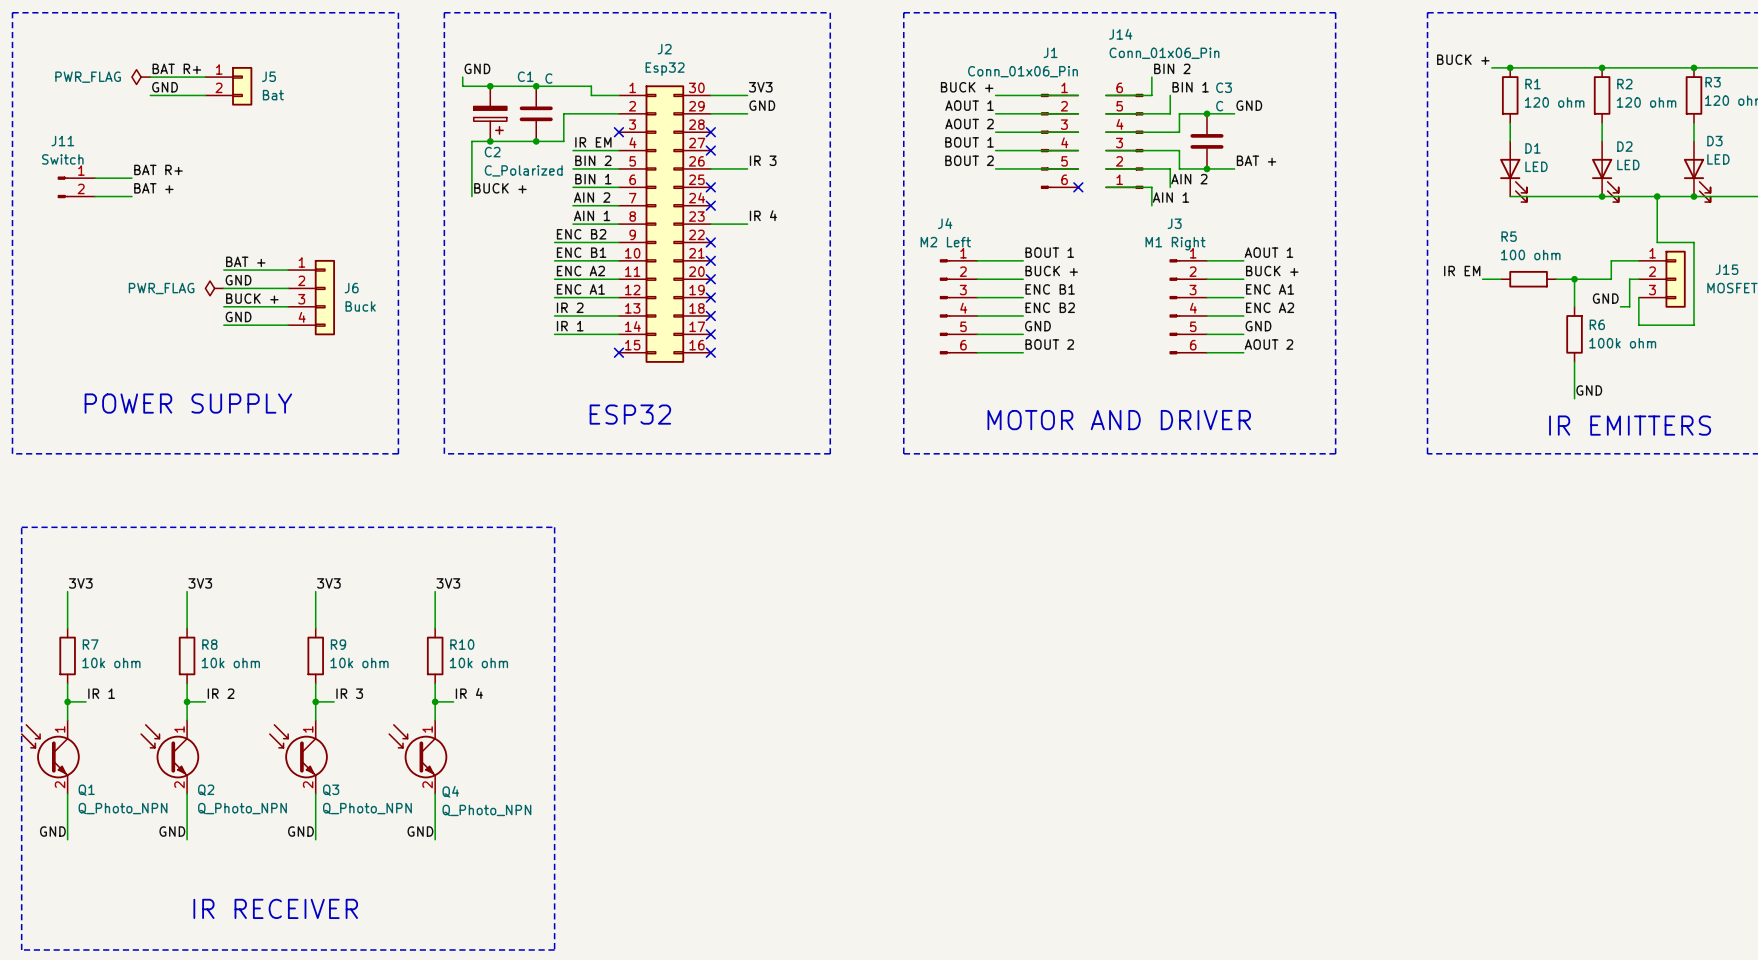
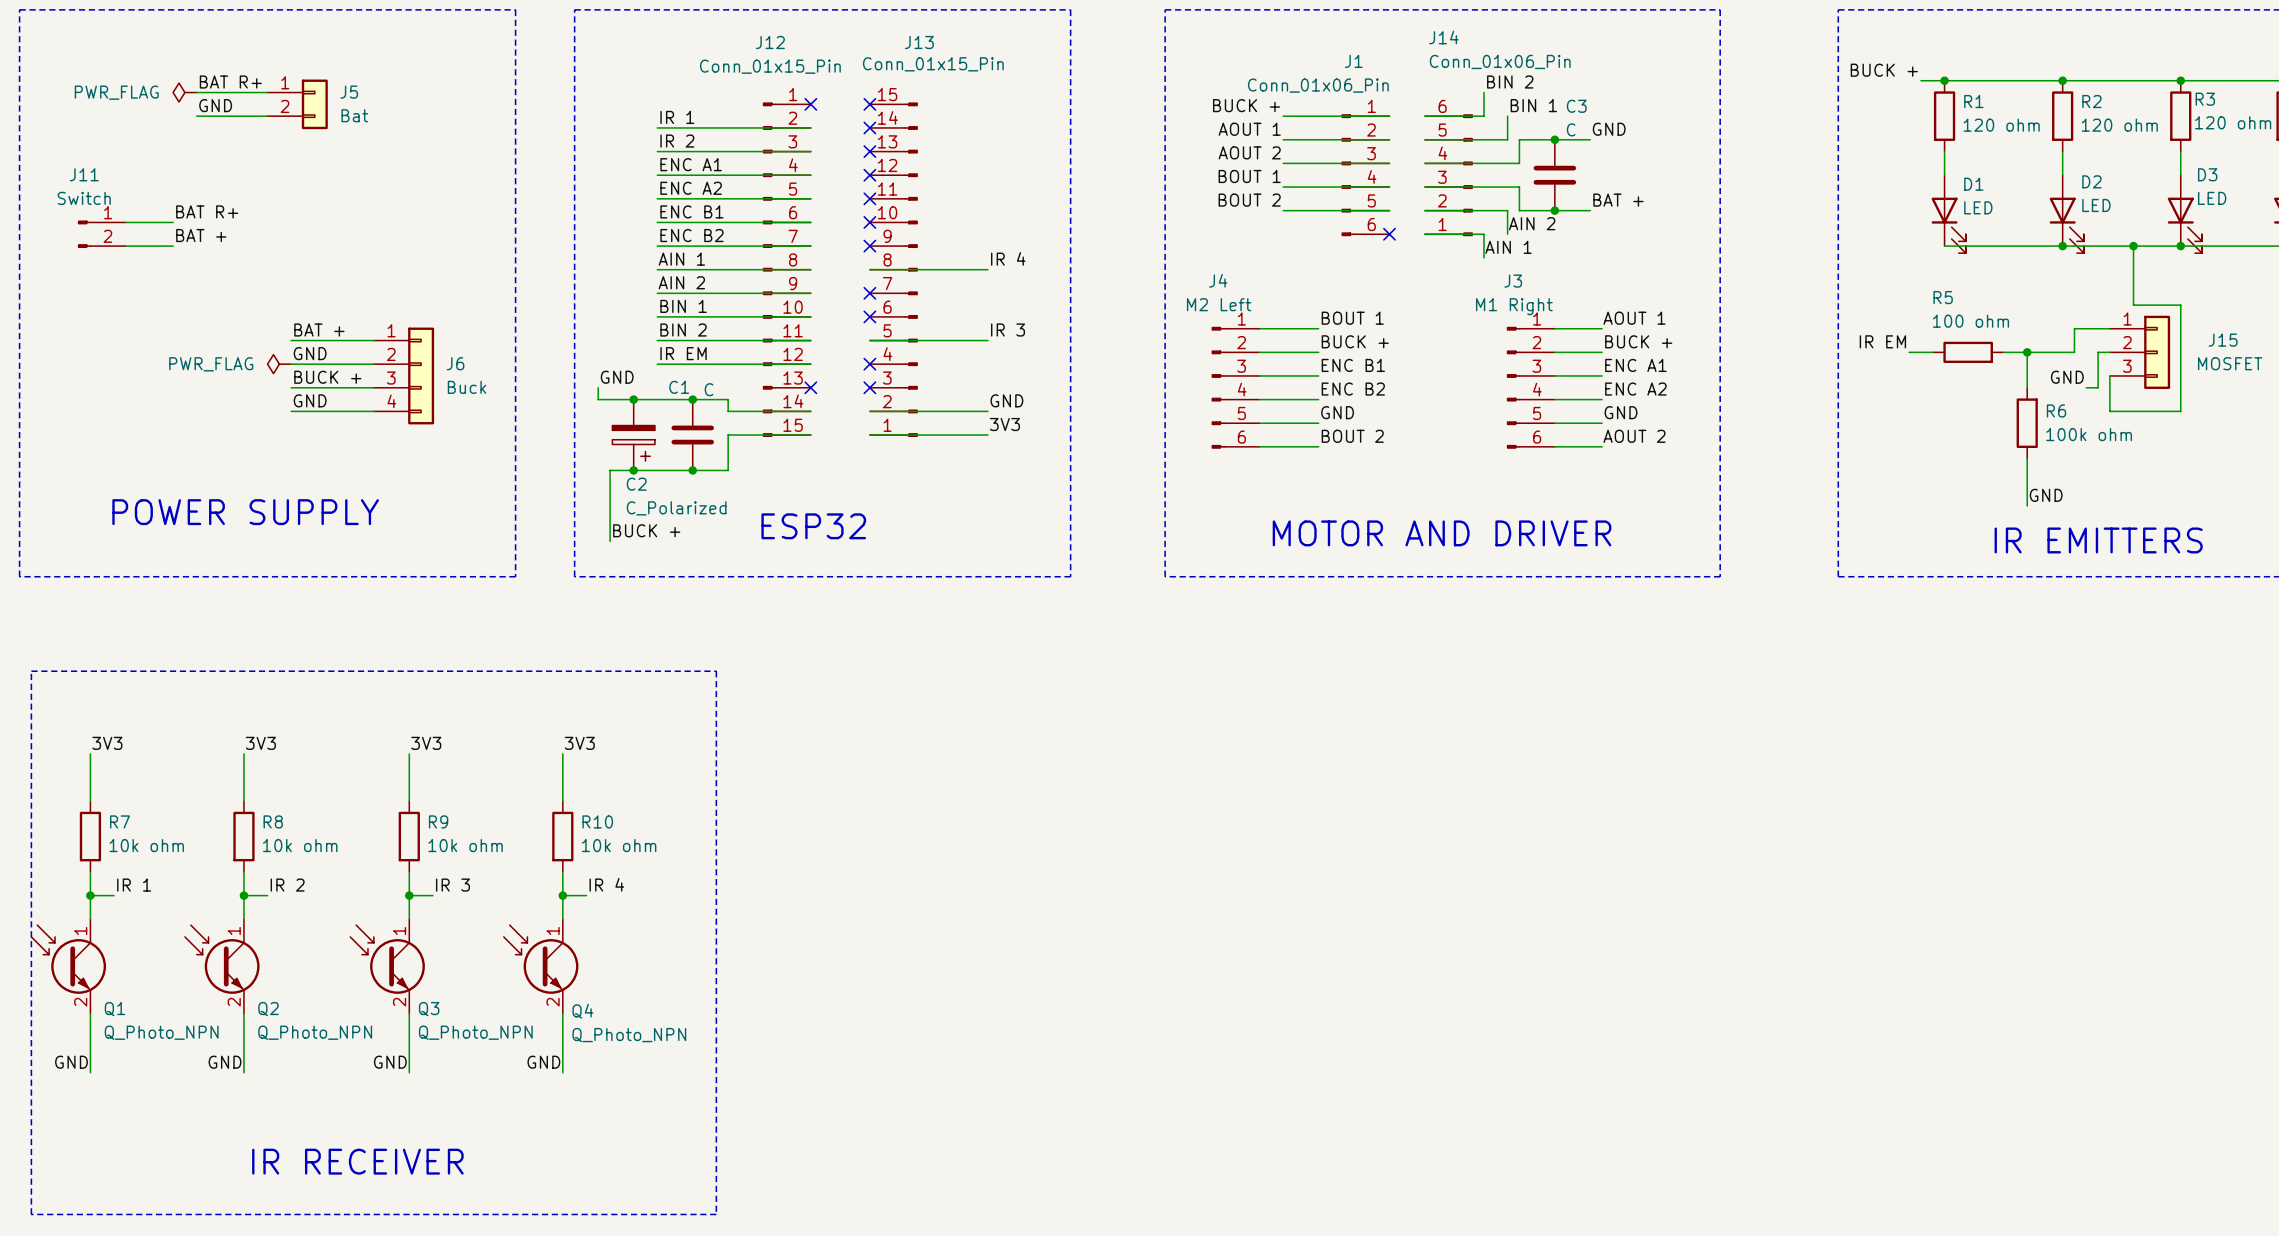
label: GND (477, 68) -> none
wire: (462, 77) (462, 86) (591, 86) (591, 95) (618, 95) -> none
junction: (490, 86) -> none
junction: (536, 86) -> none
no-connect mark: none -> (810, 104)
no-connect mark: none -> (869, 104)
label: 3V3 (760, 87) -> none
wire: (710, 95) (747, 95) -> none
label: none -> IR 1 (677, 117)
wire: none -> (657, 127) (810, 127)
no-connect mark: none -> (869, 127)
label: GND (762, 105) -> none
C2 position: (490, 113) -> (633, 435)
C1 position: (536, 113) -> (692, 435)
wire: (618, 113) (563, 113) (563, 141) -> (810, 175) (728, 175)
wire: (710, 113) (747, 113) -> none
label: none -> IR 2 (677, 141)
wire: none -> (657, 151) (810, 151)
no-connect mark: none -> (869, 151)
no-connect mark: (618, 132) -> none
no-connect mark: (710, 132) -> none
junction: (490, 141) -> none
wire: (508, 141) (471, 141) (471, 196) -> none
junction: (536, 141) -> none
no-connect mark: none -> (869, 175)
label position: IR EM (593, 142) -> IR EM (683, 353)
wire: (572, 150) (618, 150) -> none
no-connect mark: (710, 150) -> none
wire: none -> (657, 198) (810, 198)
no-connect mark: none -> (869, 198)
label position: BIN 2 (593, 160) -> BIN 2 (683, 330)
label position: IR 3 (763, 160) -> IR 3 (1008, 330)
wire: (572, 168) (618, 168) -> none
wire: (710, 168) (747, 168) -> none
wire: none -> (657, 222) (810, 222)
no-connect mark: none -> (869, 222)
label position: BIN 1 (593, 179) -> BIN 1 (683, 306)
wire: (572, 187) (618, 187) -> none
no-connect mark: (710, 187) -> none
label: BUCK + (500, 188) -> none
wire: none -> (657, 246) (810, 246)
no-connect mark: none -> (869, 246)
label position: AIN 2 (592, 197) -> AIN 2 (681, 282)
wire: (572, 205) (618, 205) -> none
no-connect mark: (710, 205) -> none
wire: none -> (657, 269) (810, 269)
J12: none -> Conn_01x15_Pin (786, 269)
wire: none -> (869, 269) (987, 269)
J13: none -> Conn_01x15_Pin (893, 269)
label position: AIN 1 (592, 215) -> AIN 1 (681, 259)
label position: IR 4 (763, 215) -> IR 4 (1008, 258)
wire: (572, 224) (618, 224) -> none
J2: Esp32 (664, 224) -> none
wire: (710, 224) (747, 224) -> none
wire: none -> (657, 293) (810, 293)
no-connect mark: none -> (869, 293)
label position: ENC B2 (581, 234) -> ENC B2 (691, 235)
wire: (554, 242) (618, 242) -> none
no-connect mark: (710, 242) -> none
wire: none -> (657, 316) (810, 316)
no-connect mark: none -> (869, 316)
label position: ENC B1 (581, 252) -> ENC B1 (691, 211)
wire: (554, 260) (618, 260) -> none
no-connect mark: (710, 260) -> none
wire: none -> (657, 340) (810, 340)
wire: none -> (869, 340) (987, 340)
label position: ENC A2 (580, 271) -> ENC A2 (691, 188)
wire: (554, 279) (618, 279) -> none
no-connect mark: (710, 279) -> none
wire: none -> (657, 364) (810, 364)
no-connect mark: none -> (869, 364)
label position: ENC A1 (580, 289) -> ENC A1 (691, 164)
wire: (554, 297) (618, 297) -> none
no-connect mark: (710, 297) -> none
label: none -> GND (617, 377)
wire: none -> (598, 387) (598, 399) (716, 399)
no-connect mark: none -> (810, 387)
no-connect mark: none -> (869, 387)
label: IR 2 (570, 307) -> none
junction: none -> (633, 399)
junction: none -> (692, 399)
wire: (563, 315) (618, 315) -> (728, 399) (728, 411) (810, 411)
no-connect mark: (710, 315) -> none
label: none -> GND (1006, 400)
wire: none -> (869, 411) (987, 411)
label: IR 1 (570, 326) -> none
wire: (554, 334) (618, 334) -> none
no-connect mark: (710, 334) -> none
label: none -> 3V3 (1004, 424)
wire: none -> (810, 435) (728, 435) (728, 470) (610, 470) (610, 541)
wire: none -> (869, 435) (987, 435)
no-connect mark: (618, 352) -> none
no-connect mark: (710, 352) -> none
junction: none -> (633, 470)
junction: none -> (692, 470)
label: none -> BUCK + (646, 530)

